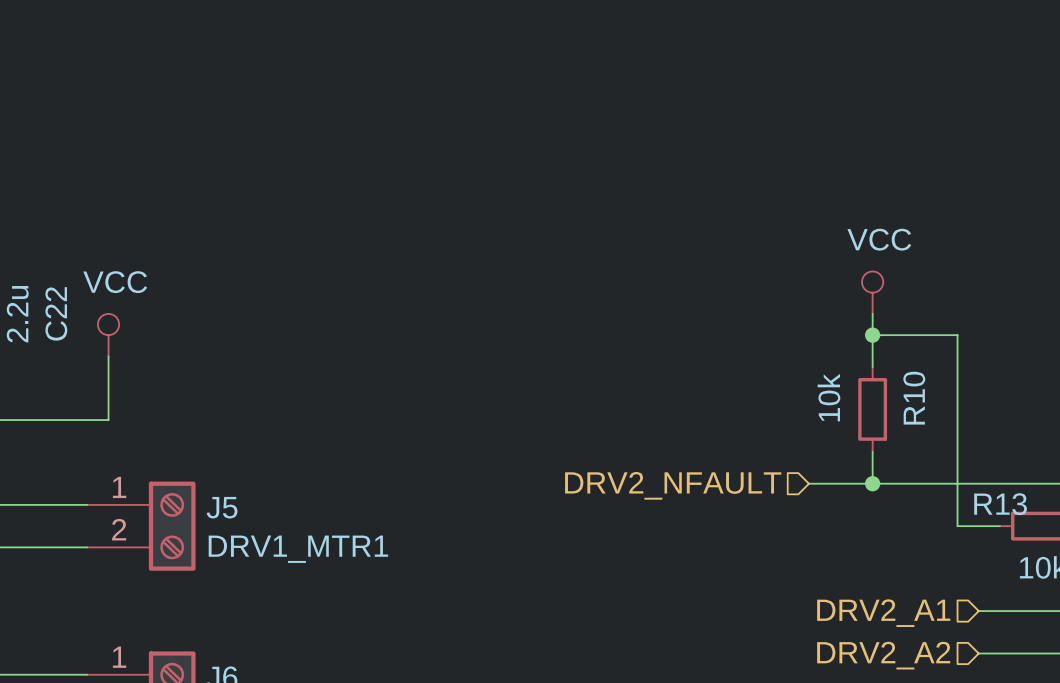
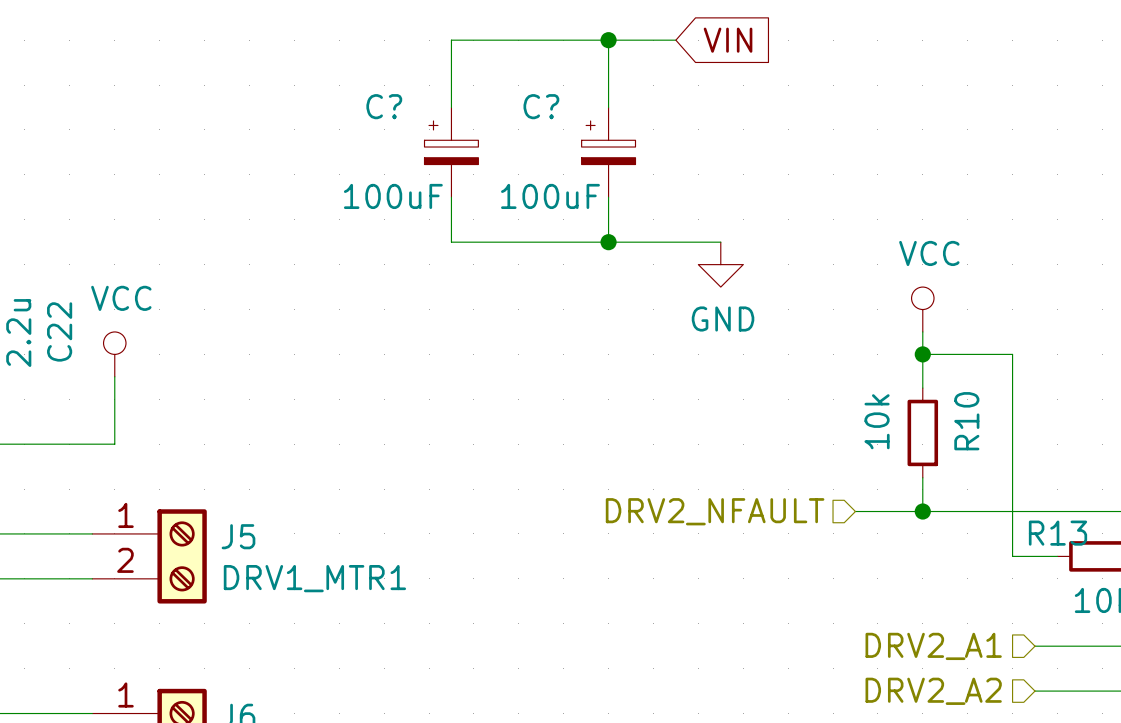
wire: none -> (608, 40) (608, 107)
junction: none -> (608, 40)
wire: none -> (675, 40) (451, 40) (451, 107)
global label: none -> VIN (728, 40)
C?: none -> 100uF (451, 152)
C?: none -> 100uF (608, 152)
wire: none -> (451, 197) (451, 242) (720, 242)
wire: none -> (608, 197) (608, 242)
junction: none -> (608, 242)
power symbol: none -> GND (720, 264)

